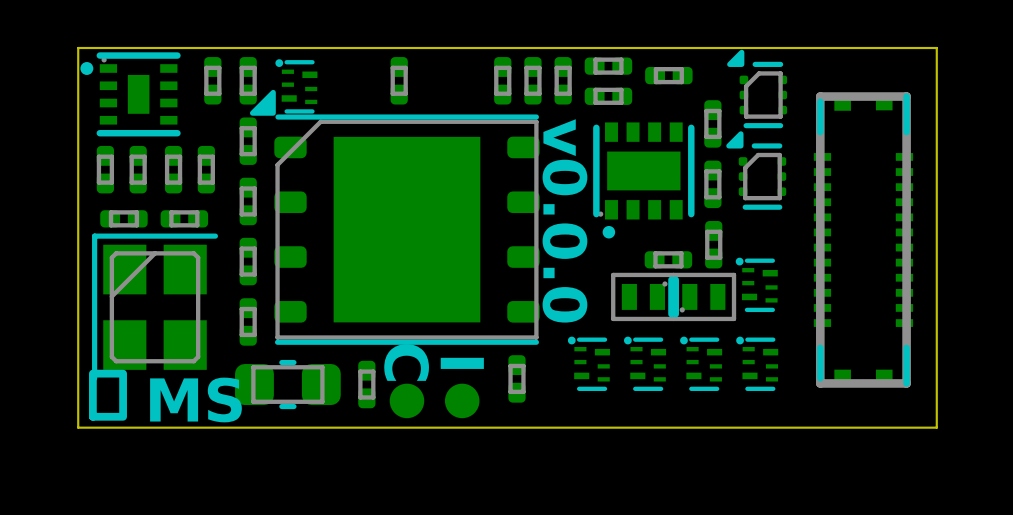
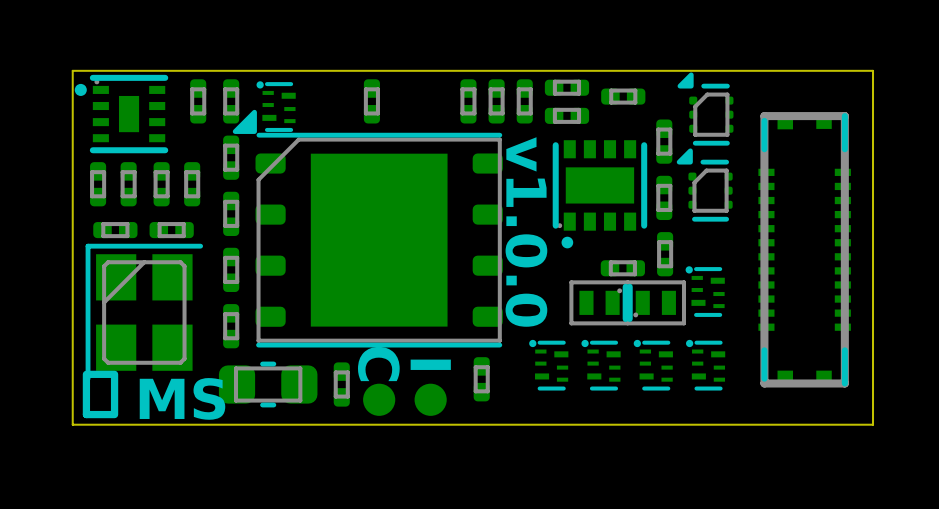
text: v0.0.0 (564, 220) -> v1.0.0 (526, 231)

